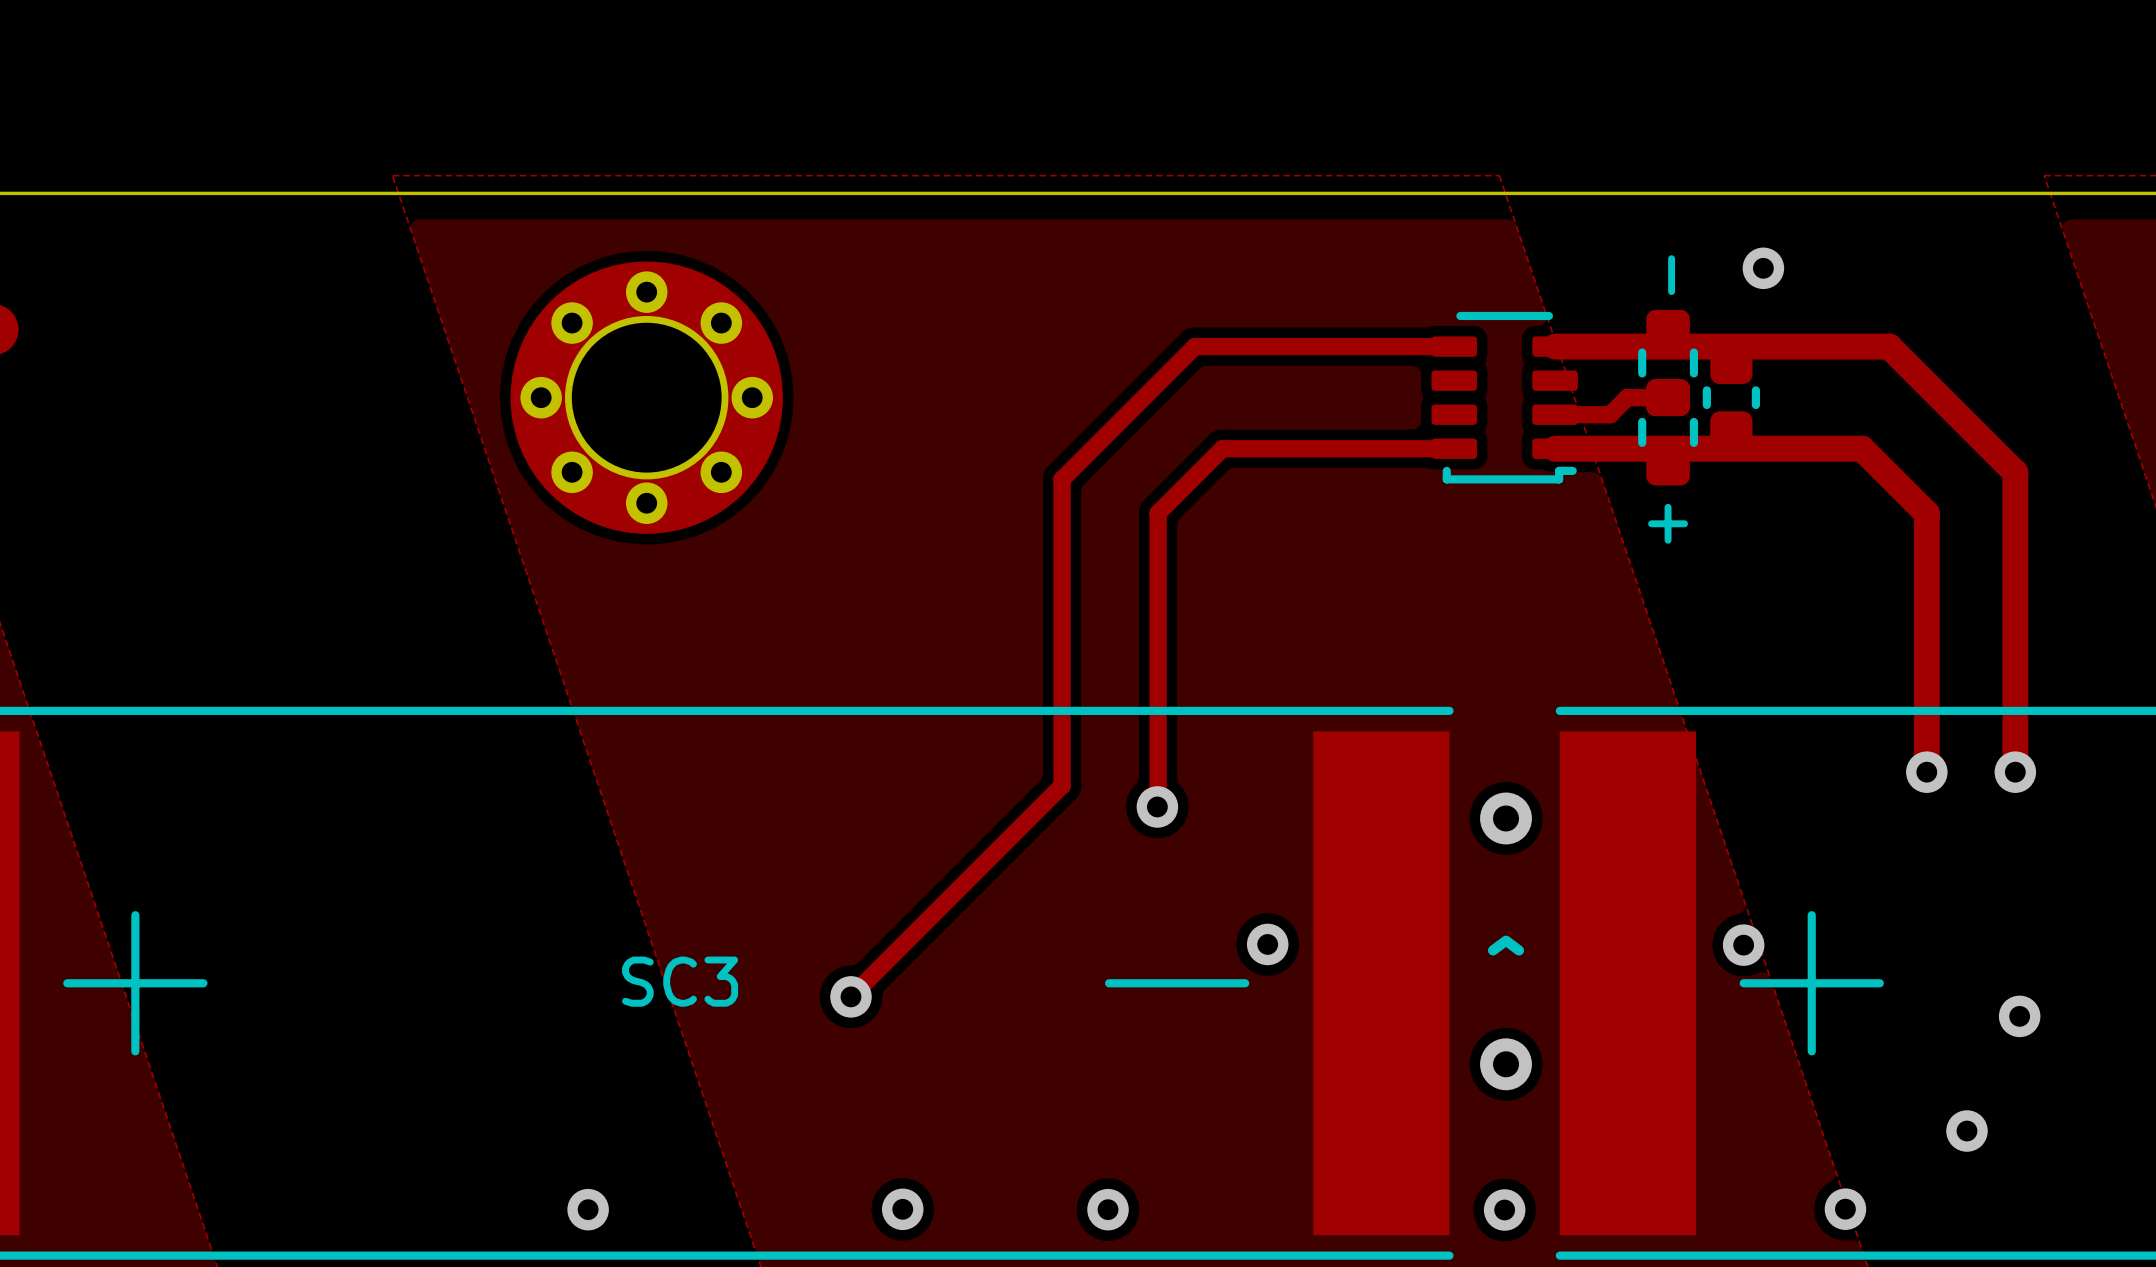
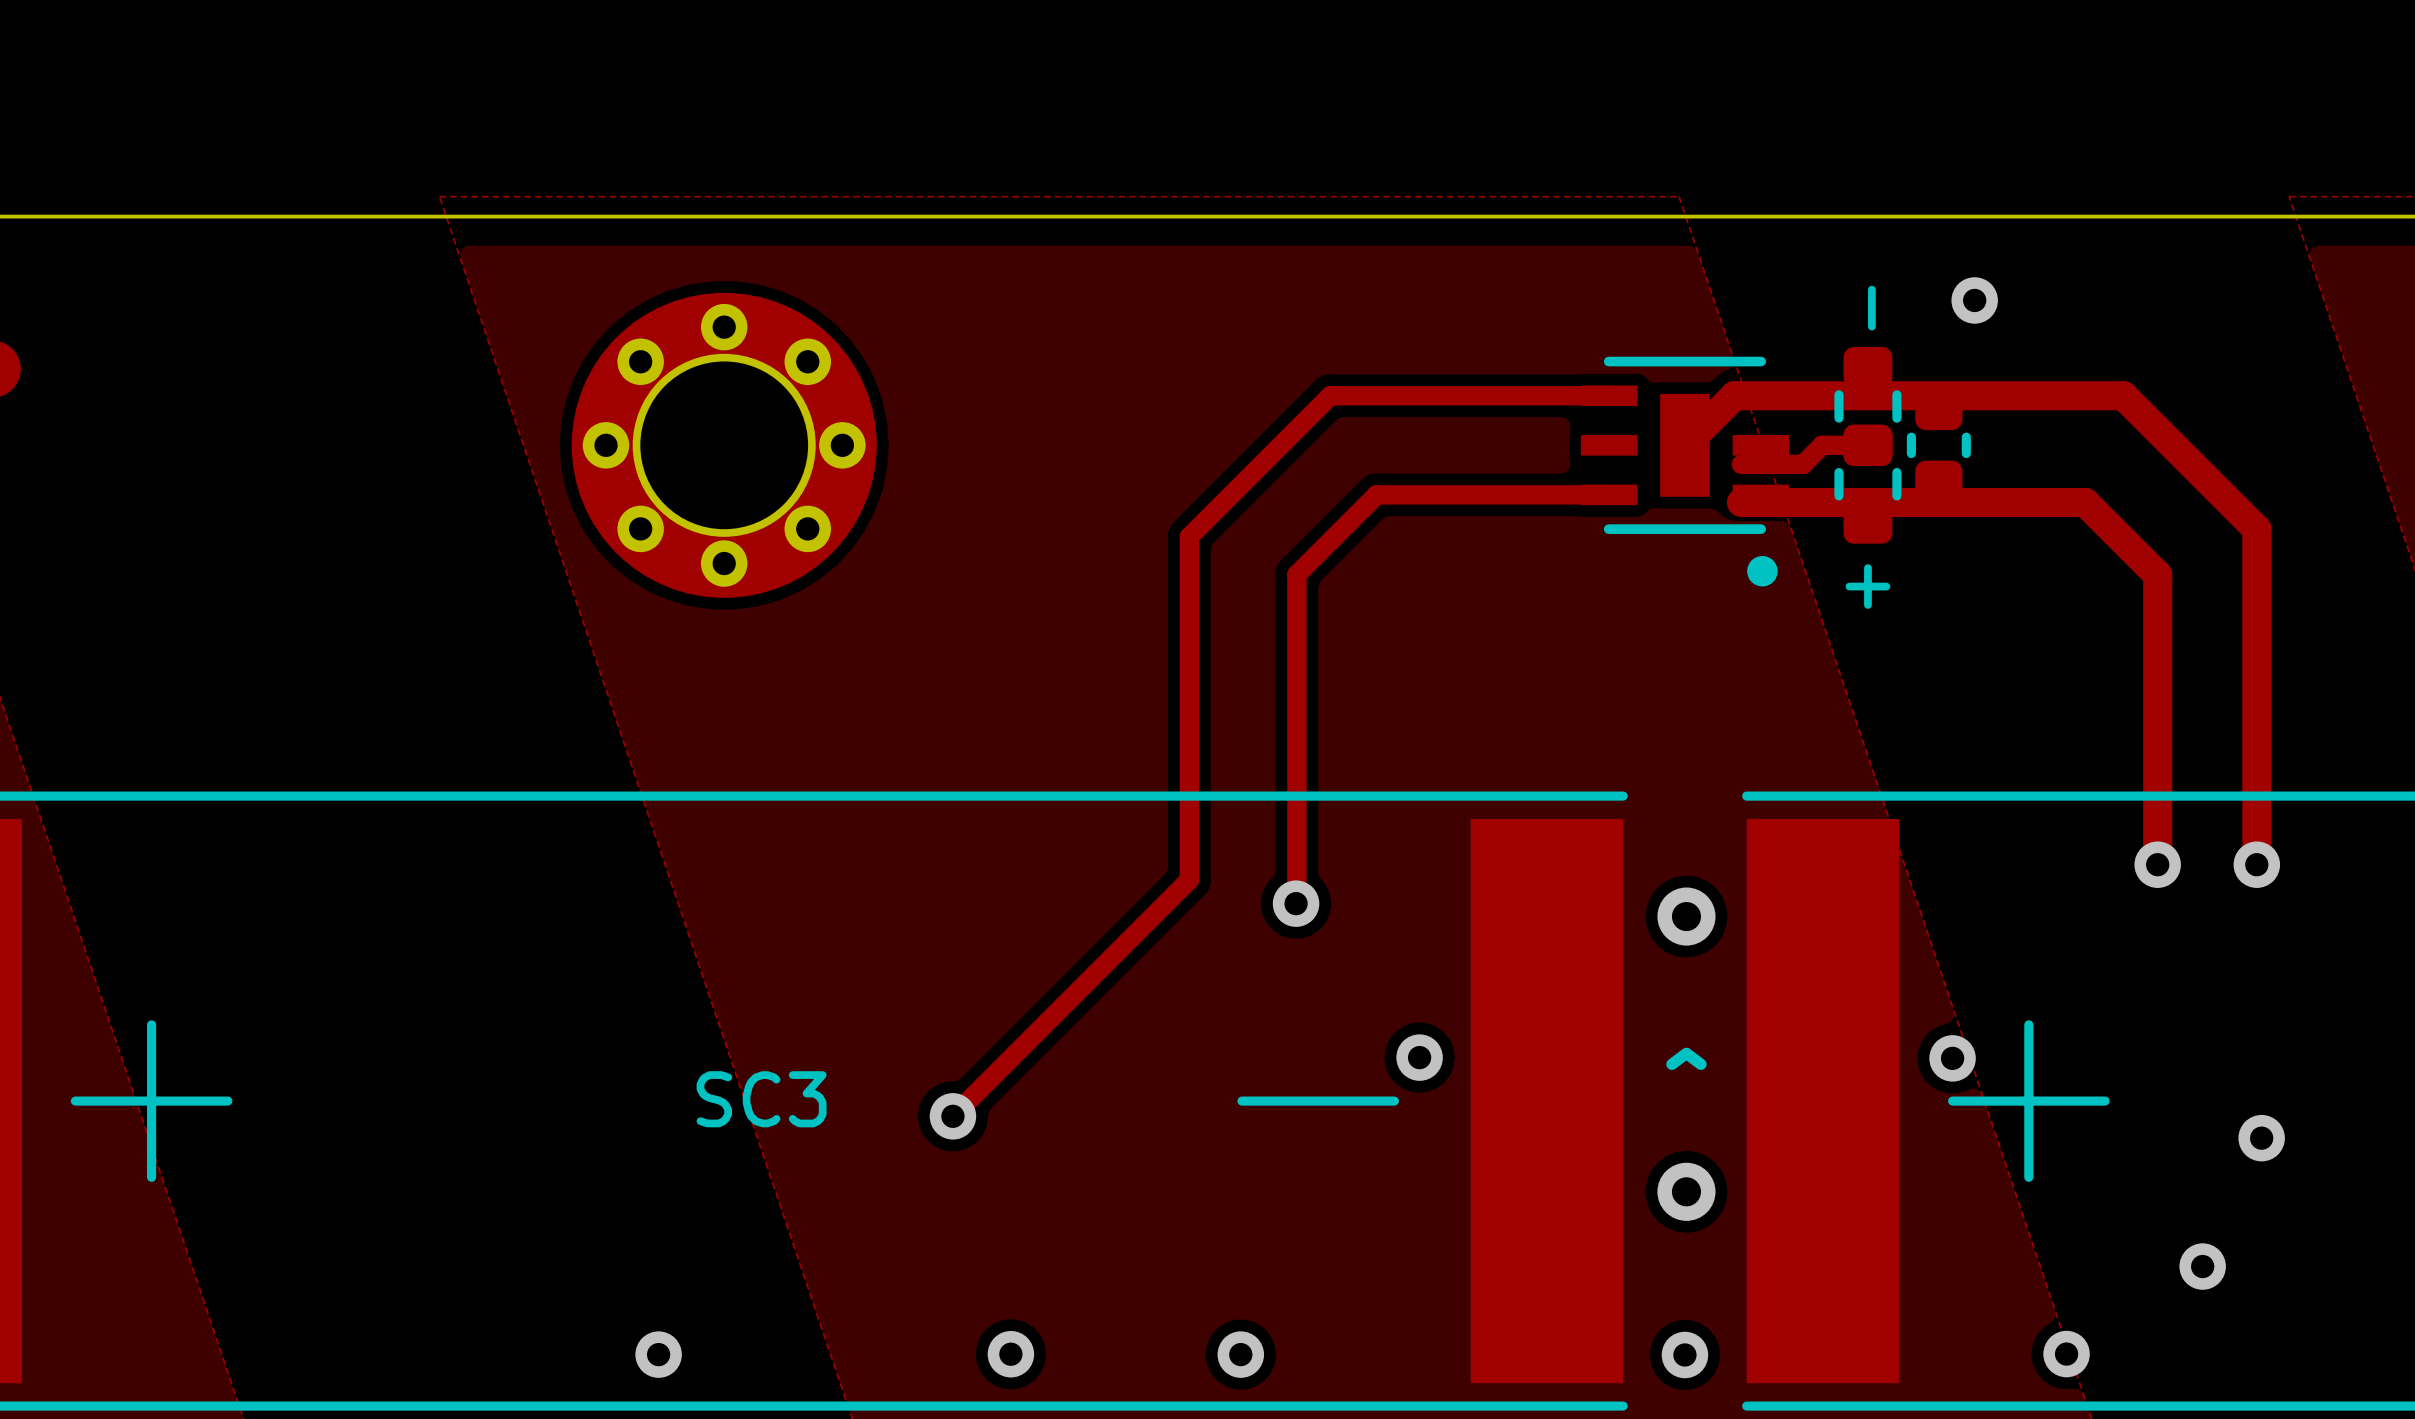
part footprint: [1431, 311, 1578, 484] -> [1580, 356, 1790, 587]
track: (1454, 346) (1194, 346) (1188, 353) -> (1609, 395) (1330, 395)
track: (1555, 346) (1889, 346) (1896, 353) -> (1684, 445) (1734, 395) (2123, 395)
track: (1222, 448) (1454, 448) -> (1369, 502) (1376, 494) (1609, 494)

